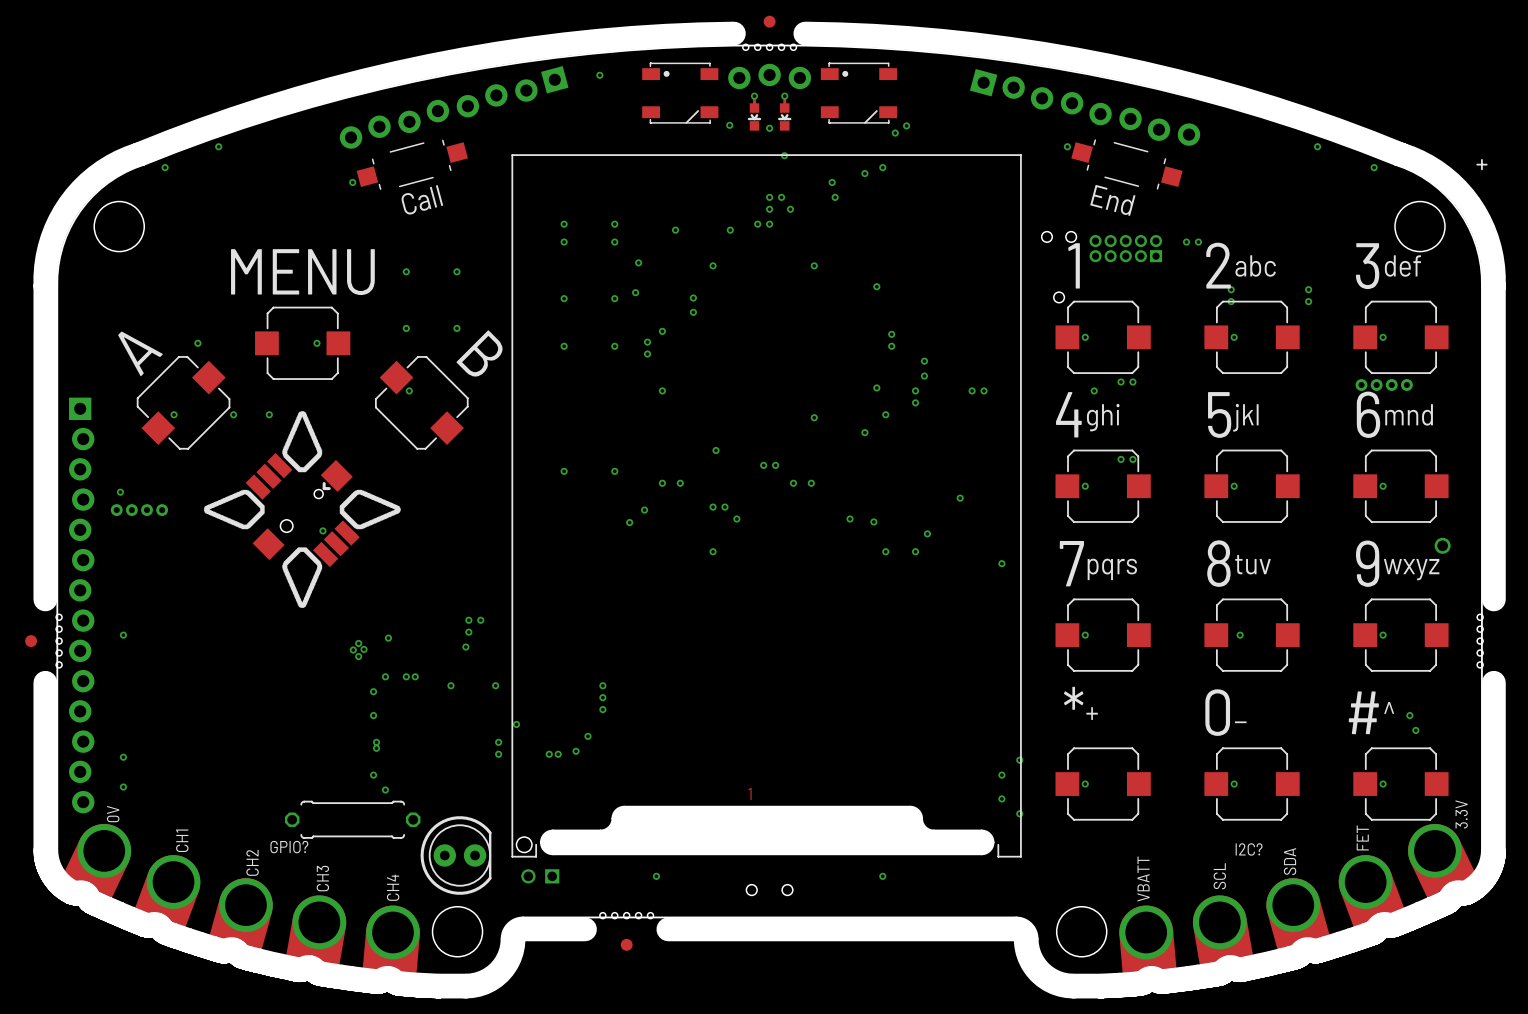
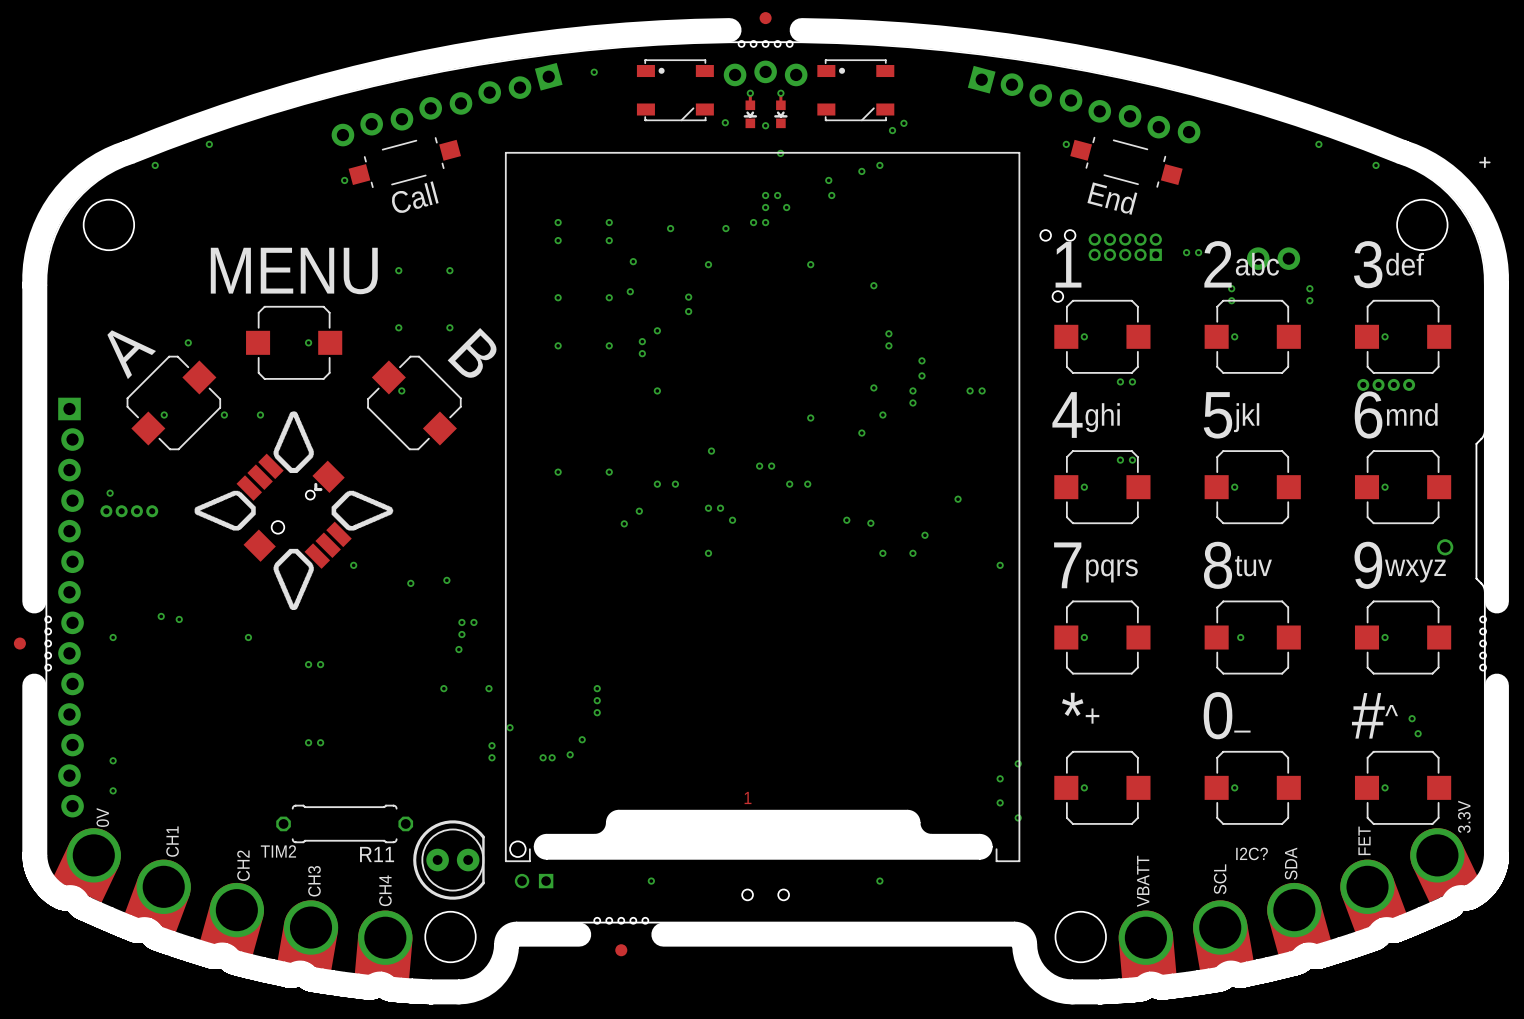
part footprint: [33, 21, 1506, 999] -> [22, 18, 1510, 1005]
via: (1186, 242) -> none
via: (1198, 242) -> none
via: none -> (1186, 252)
via: none -> (1198, 252)
part: none -> (1273, 258)
via: (1094, 390) -> none
via: (322, 530) -> none
via: none -> (353, 565)
via: none -> (446, 580)
via: none -> (410, 583)
via: none -> (161, 616)
via: none -> (179, 619)
via: none -> (248, 637)
via: (388, 638) -> none
via: (358, 643) -> none
via: (364, 649) -> none
via: (353, 650) -> none
via: (358, 656) -> none
via: none -> (308, 664)
via: none -> (320, 664)
via: (385, 676) -> none
via: (406, 676) -> none
via: (415, 676) -> none
via: (373, 691) -> none
via: (373, 715) -> none
via: none -> (308, 742)
via: none -> (320, 742)
via: (376, 742) -> none
via: (376, 748) -> none
via: (373, 775) -> none
via: (385, 789) -> none
text: GPIO? (289, 847) -> TIM2 (278, 851)
R11 name: none -> R11 (377, 854)

